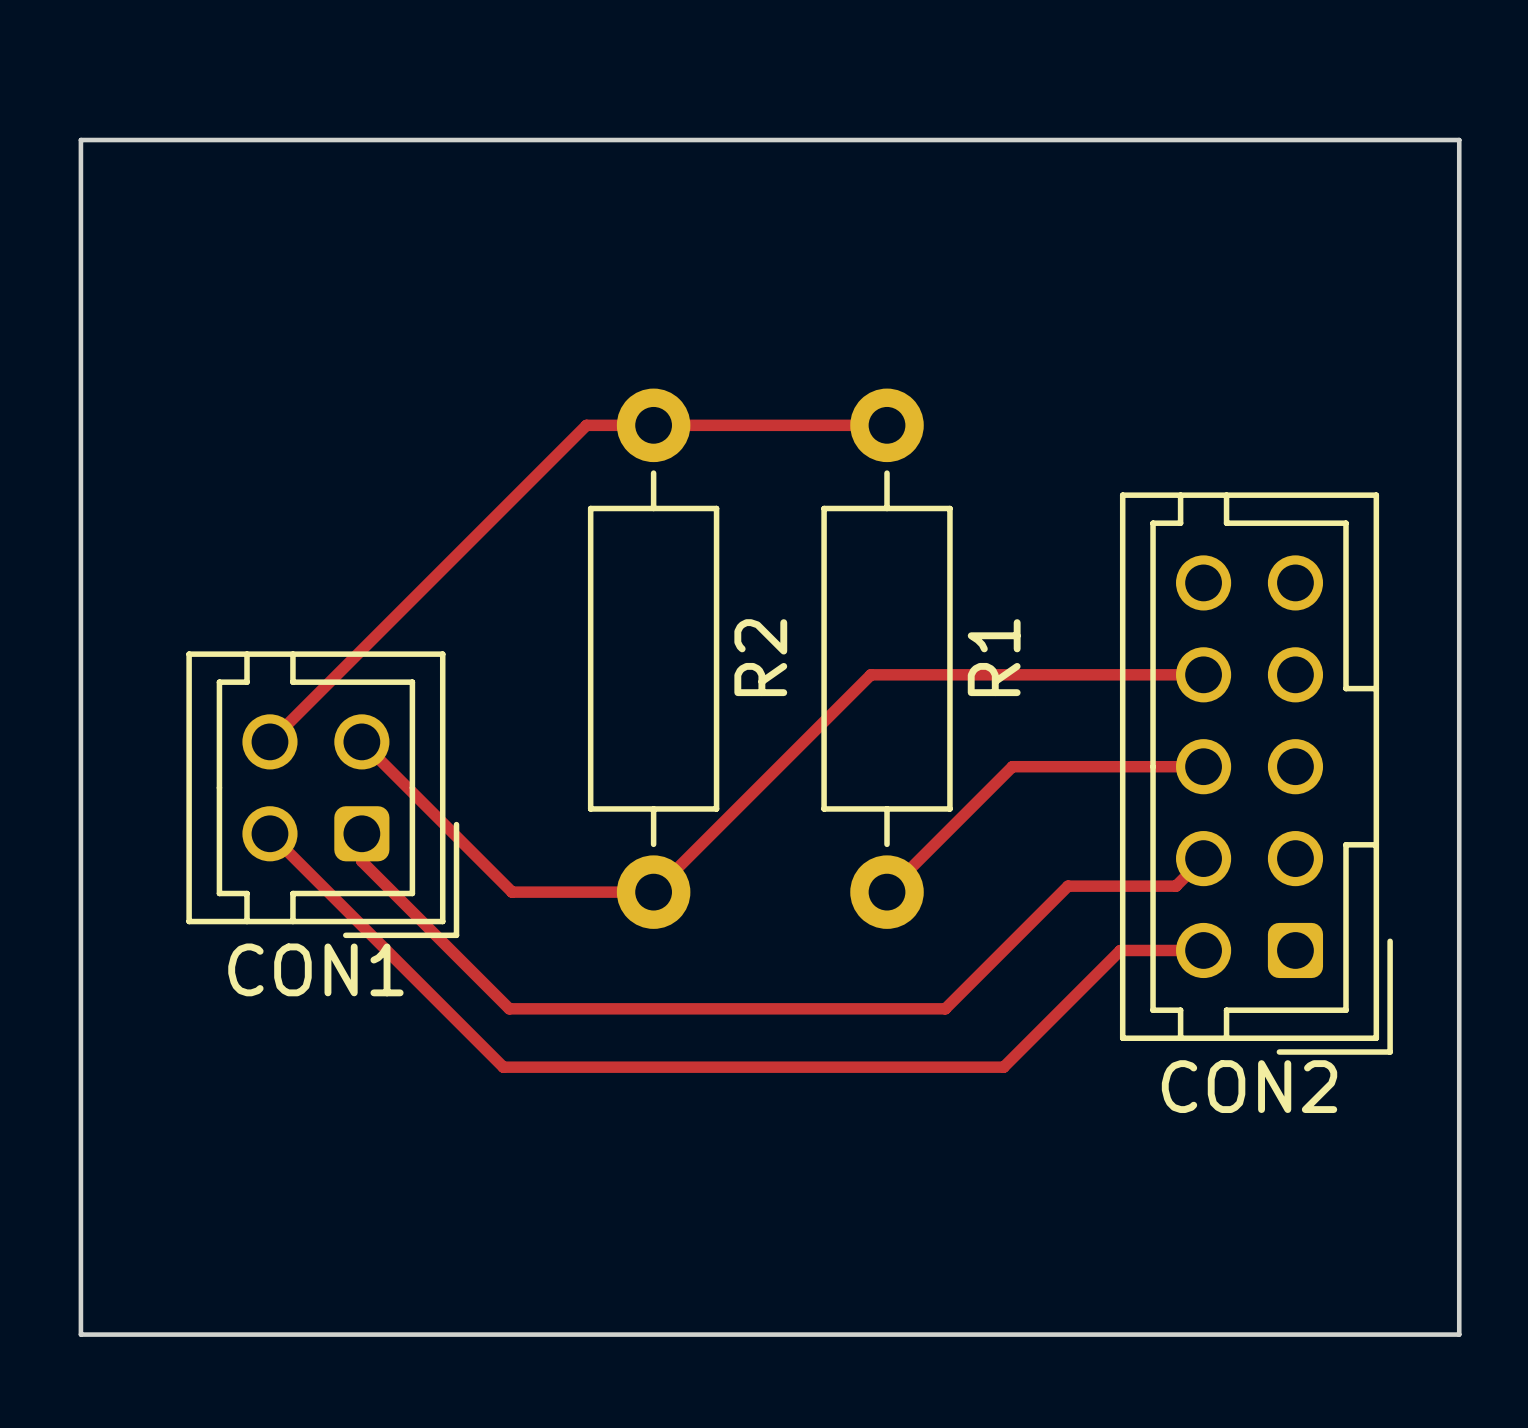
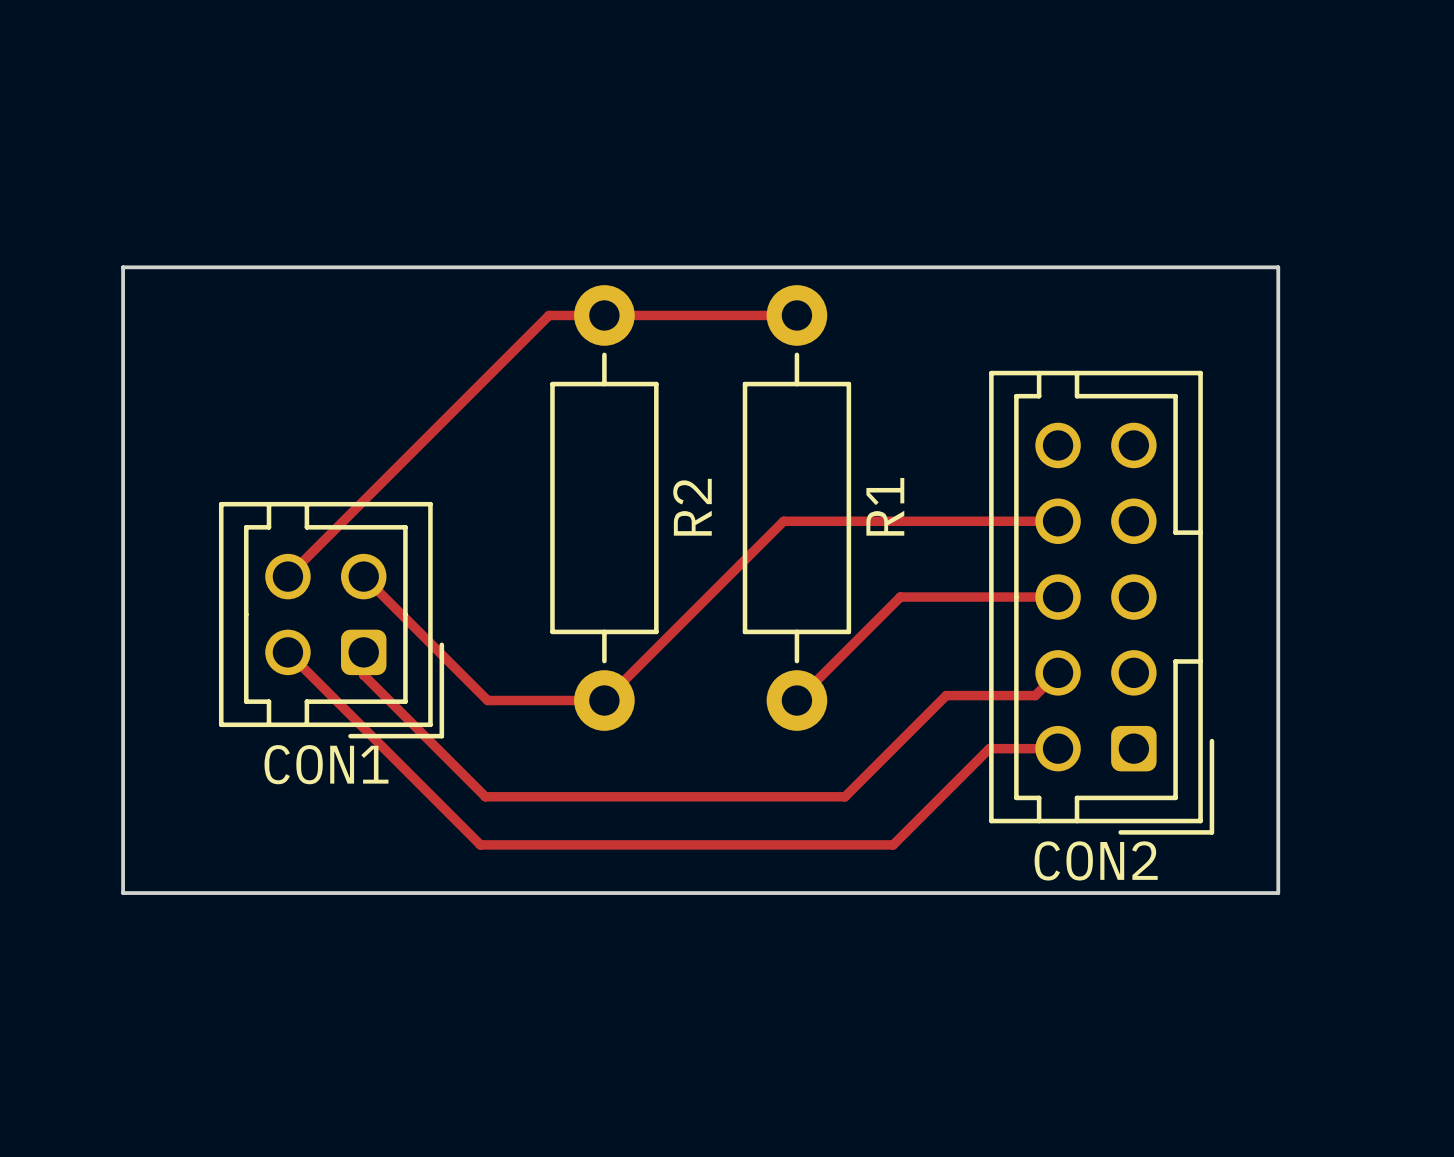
board edge: (80, 140) (1459, 140) (1459, 1334) (80, 1334) (80, 140) -> (123, 267) (123, 893) (1278, 893) (1278, 267) (123, 267)

